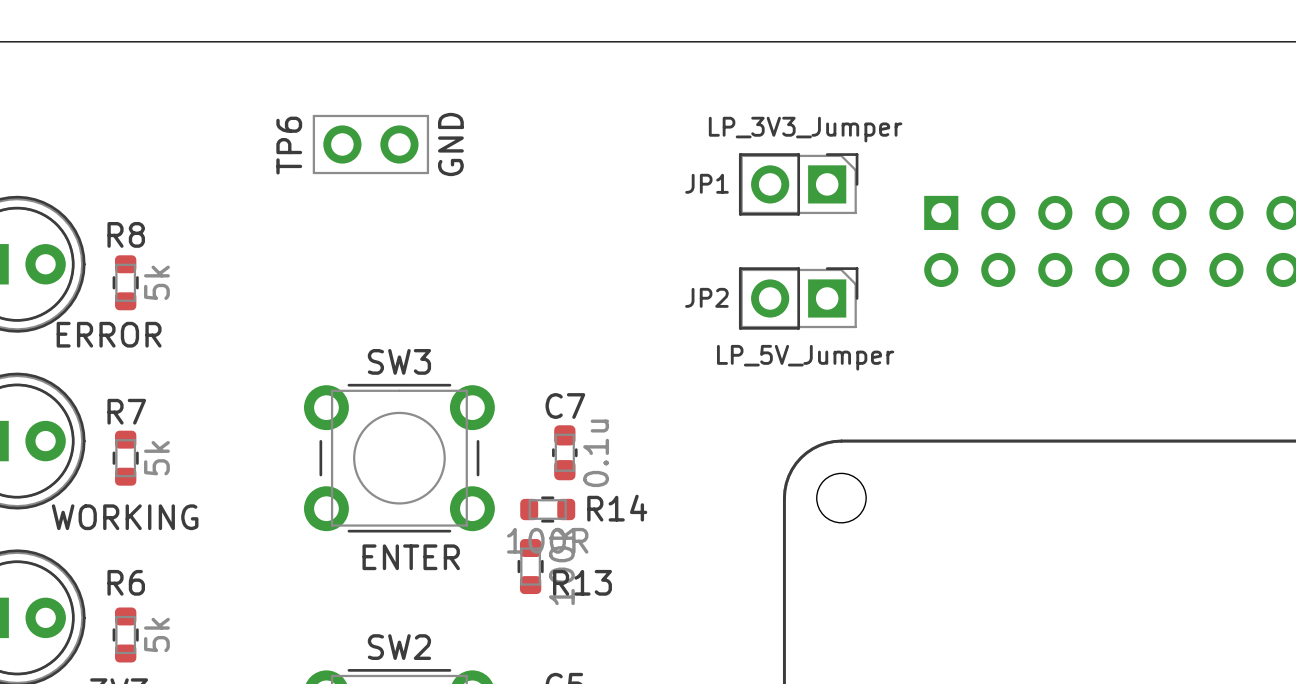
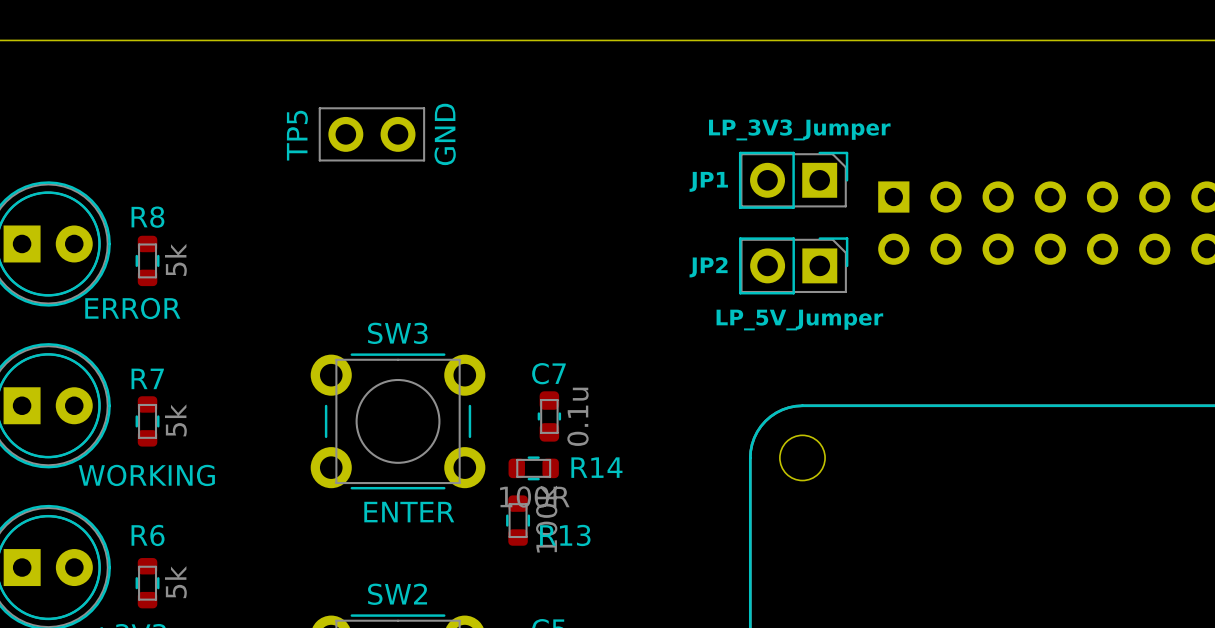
TP6 name: TP6 (289, 145) -> TP5 (297, 135)
JP1 position: (798, 184) -> (793, 180)
JP2 position: (798, 298) -> (793, 265)

